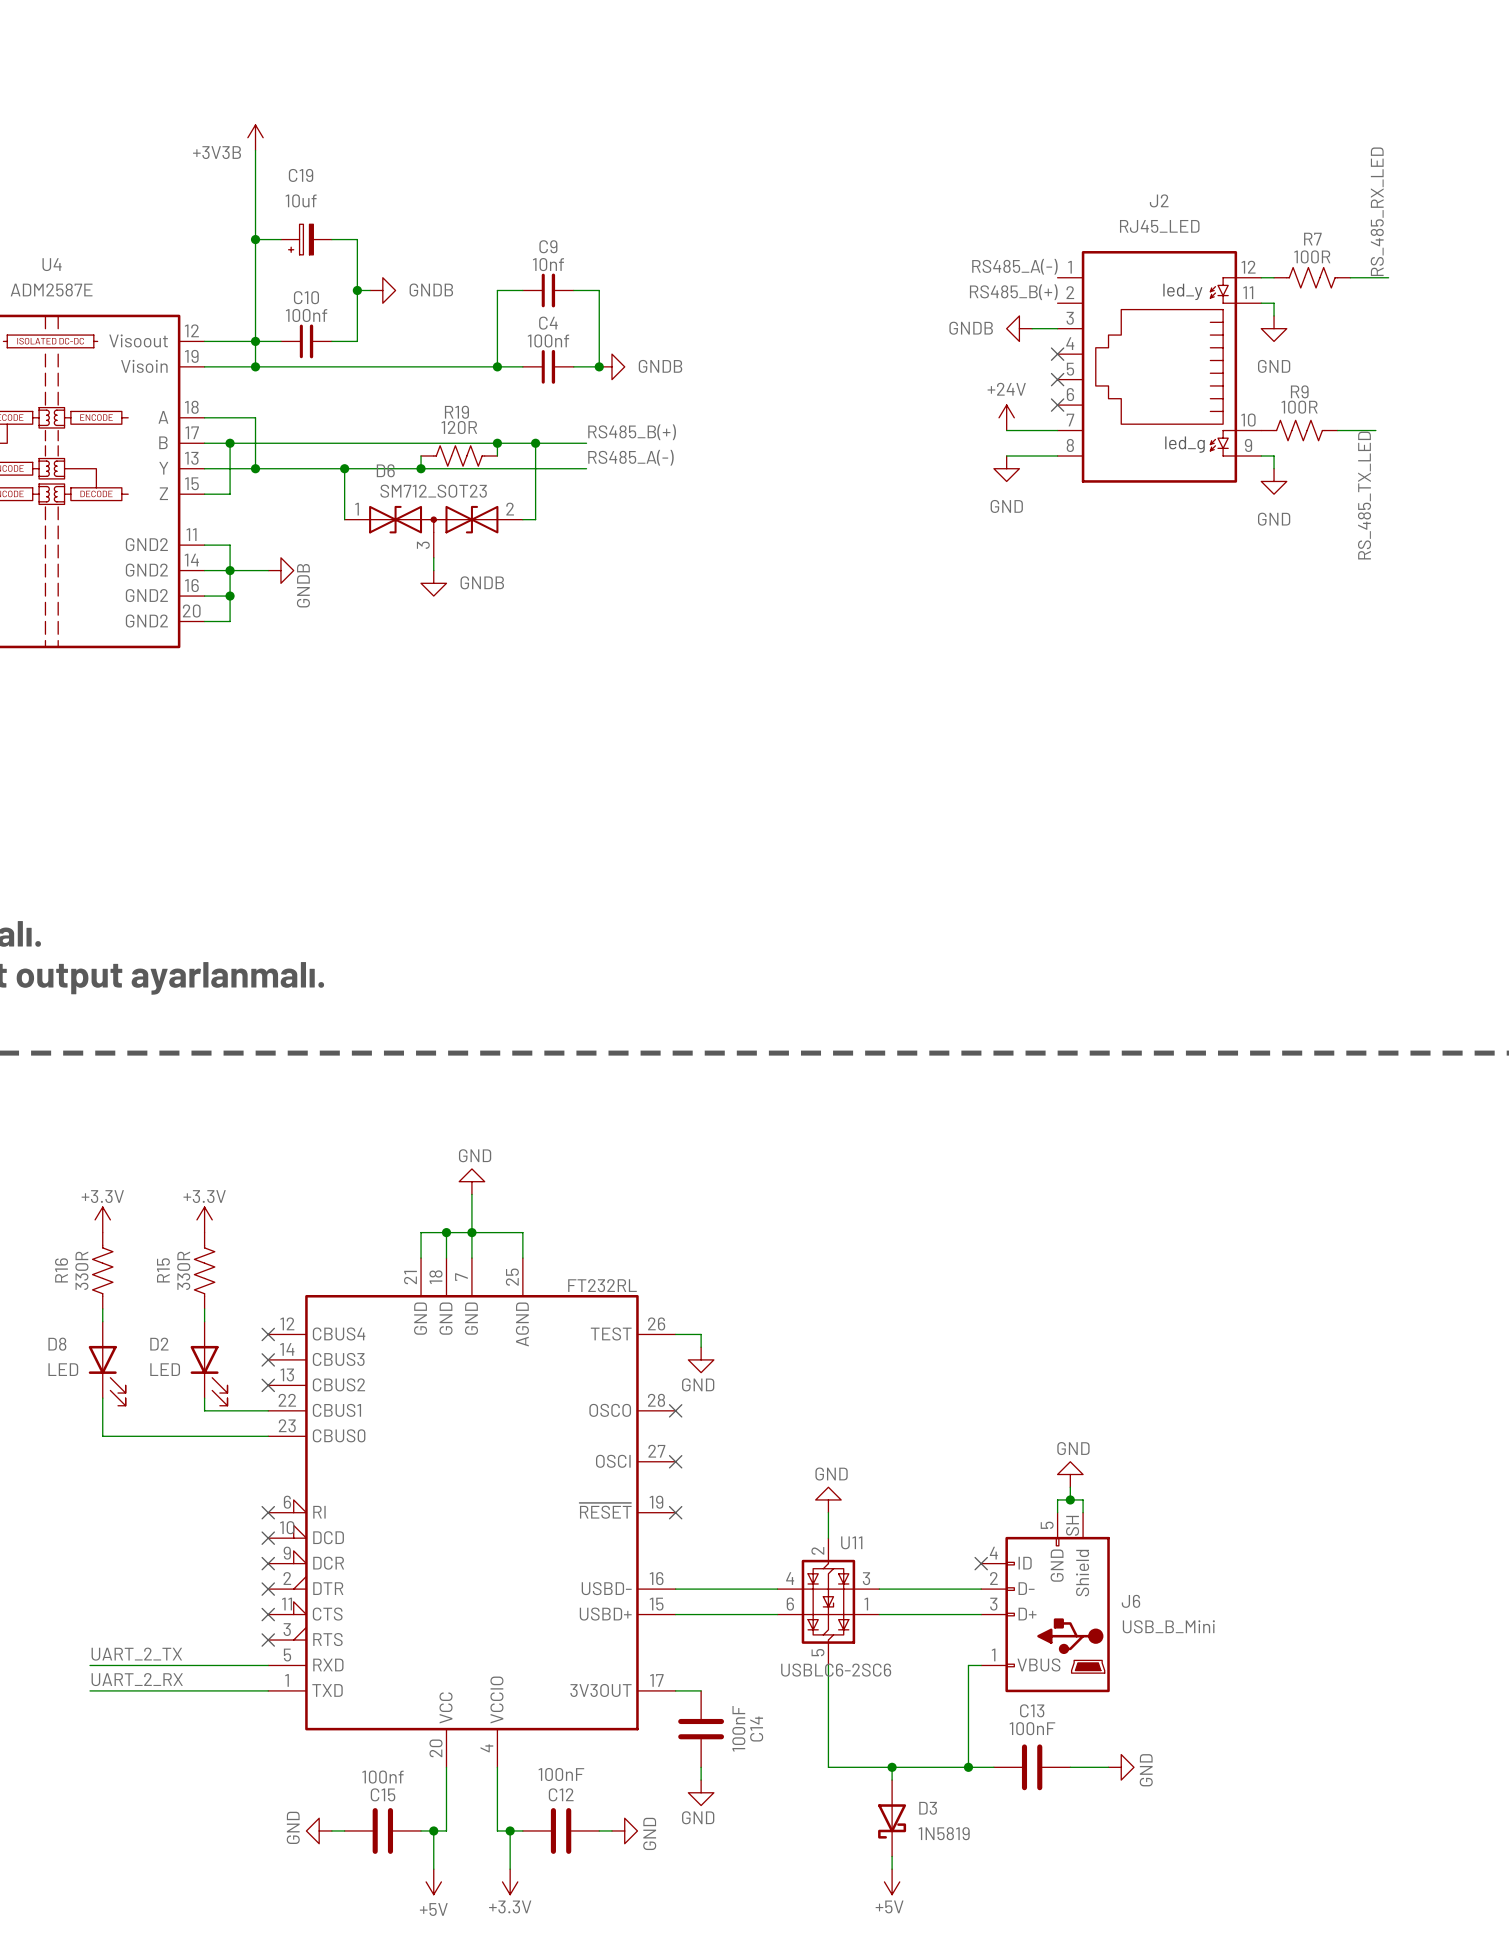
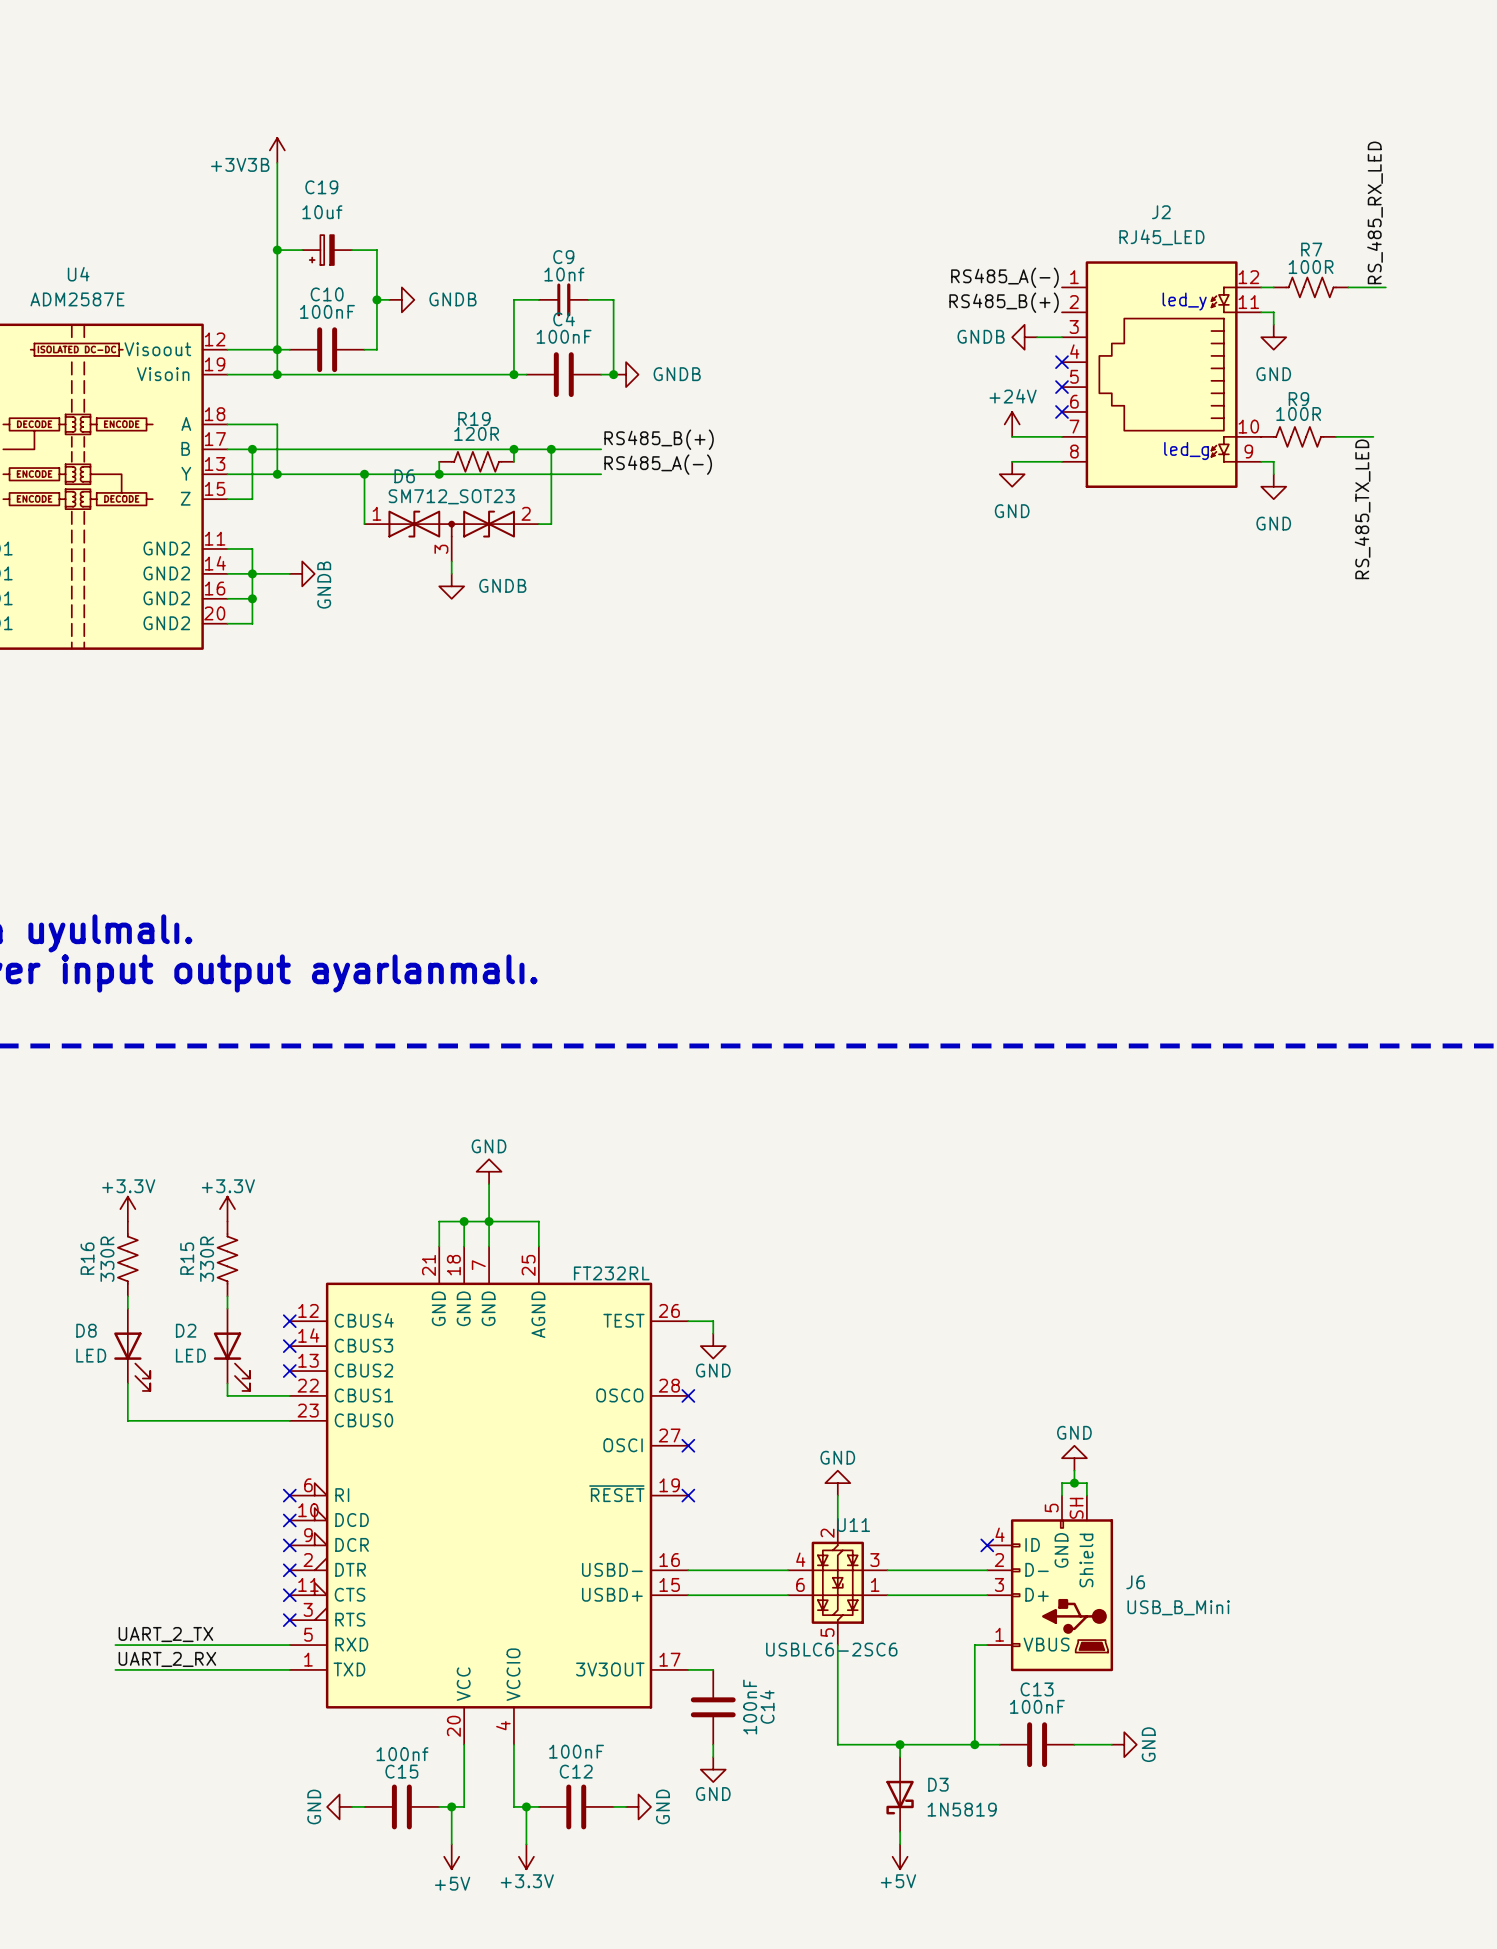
C10 value: 100nf (306, 315) -> 100nF (327, 311)
C10 symbol: [280, 324, 332, 359] -> [289, 327, 365, 373]
C4 value: 100nf (548, 340) -> 100nF (564, 336)
C4 symbol: [522, 349, 574, 384] -> [526, 352, 602, 398]

